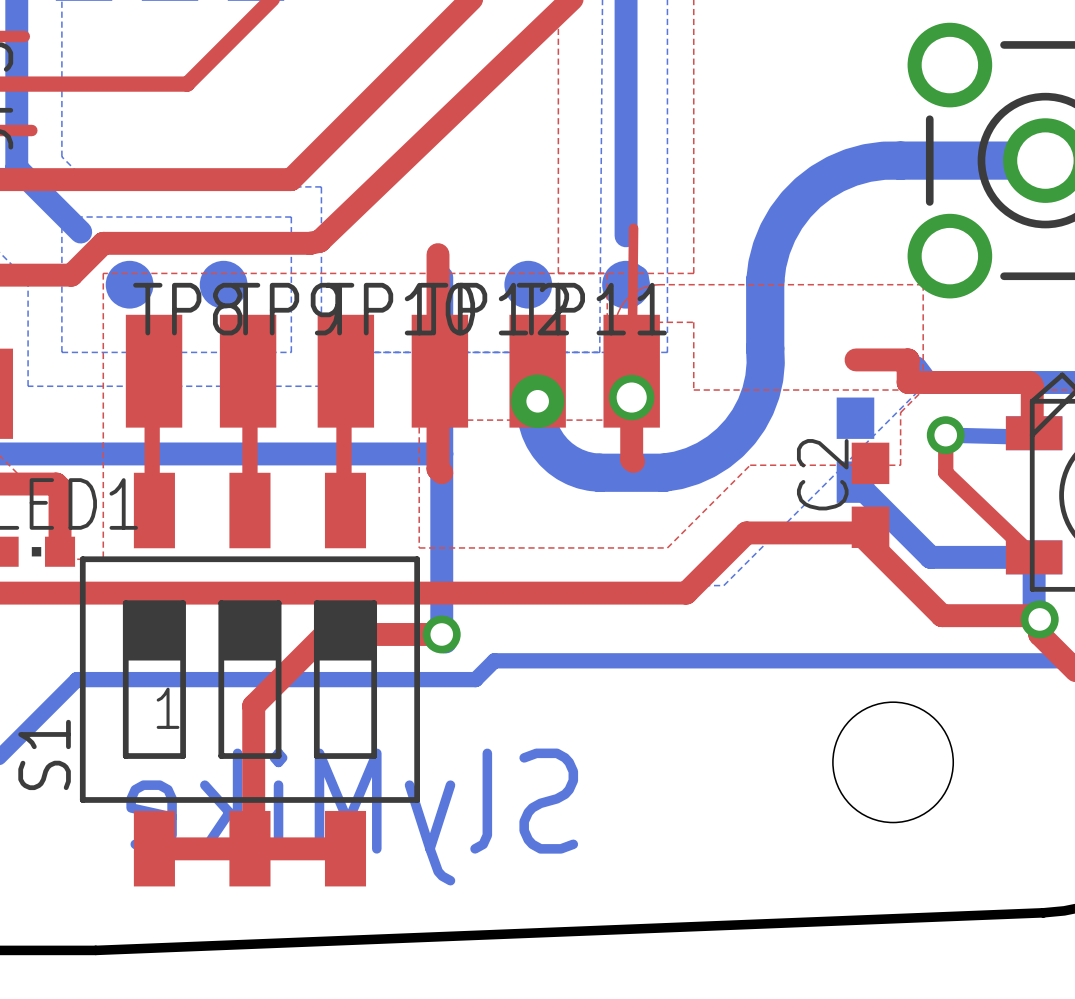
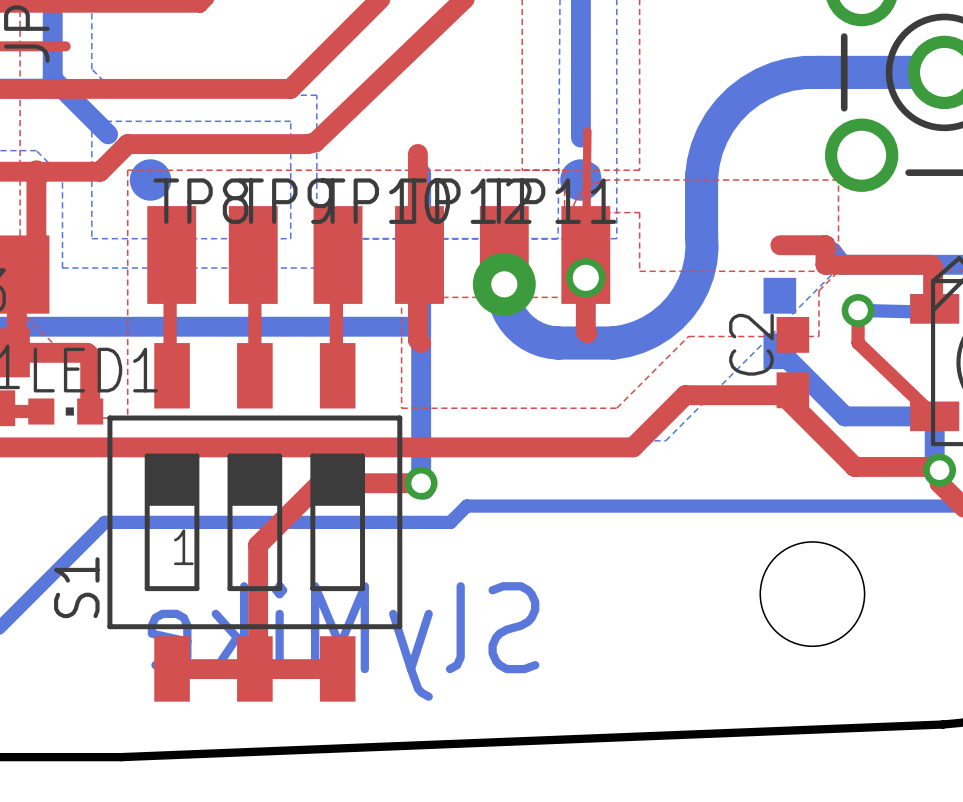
part: (223, 284) -> none
part: (528, 284) -> none
via size: [510, 374, 565, 429] -> [472, 252, 536, 316]

